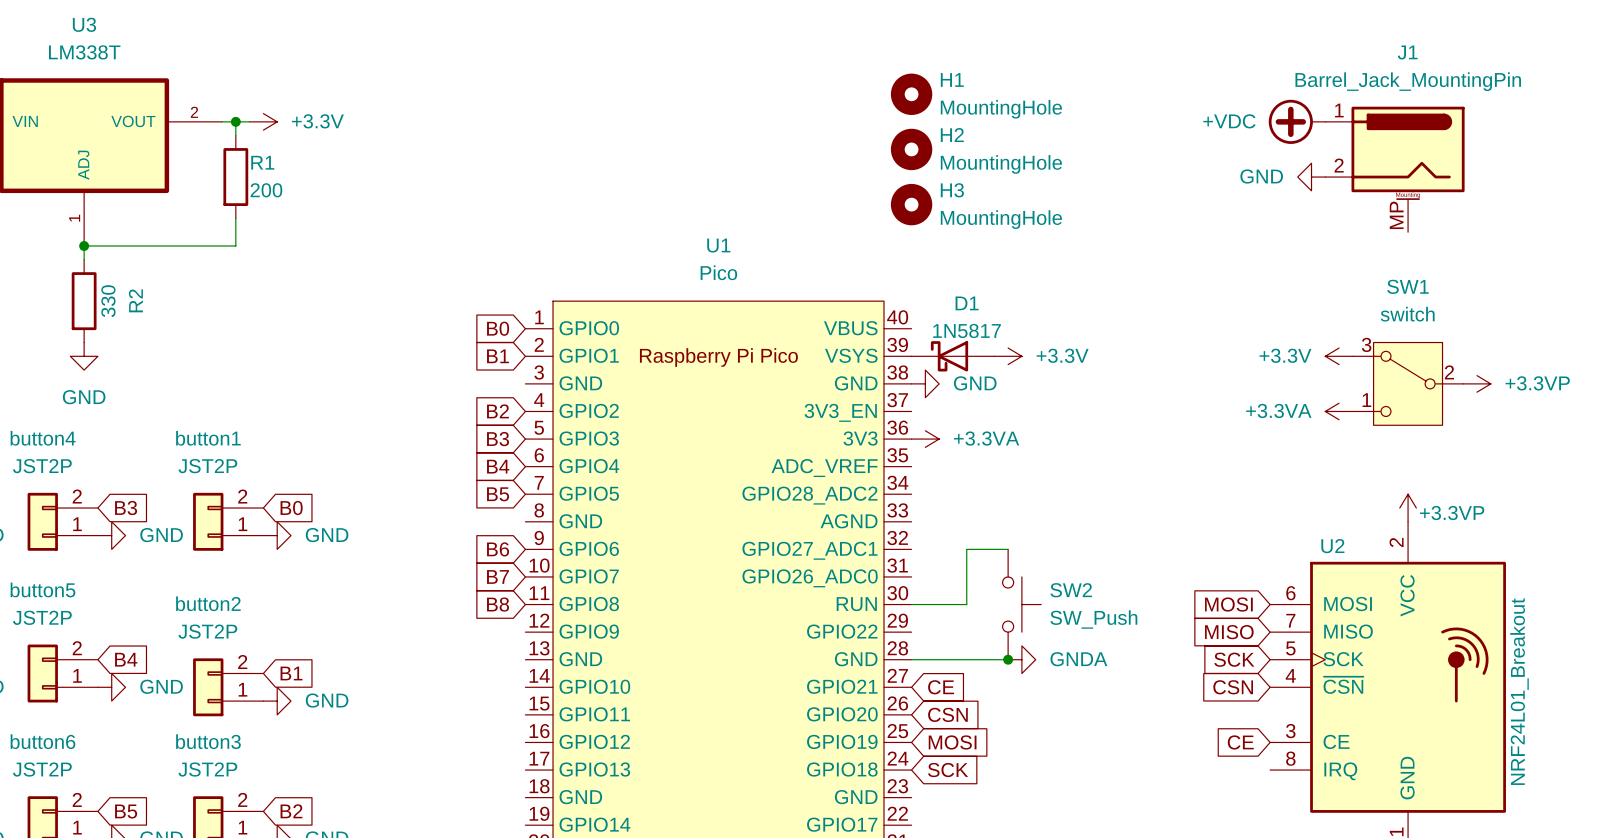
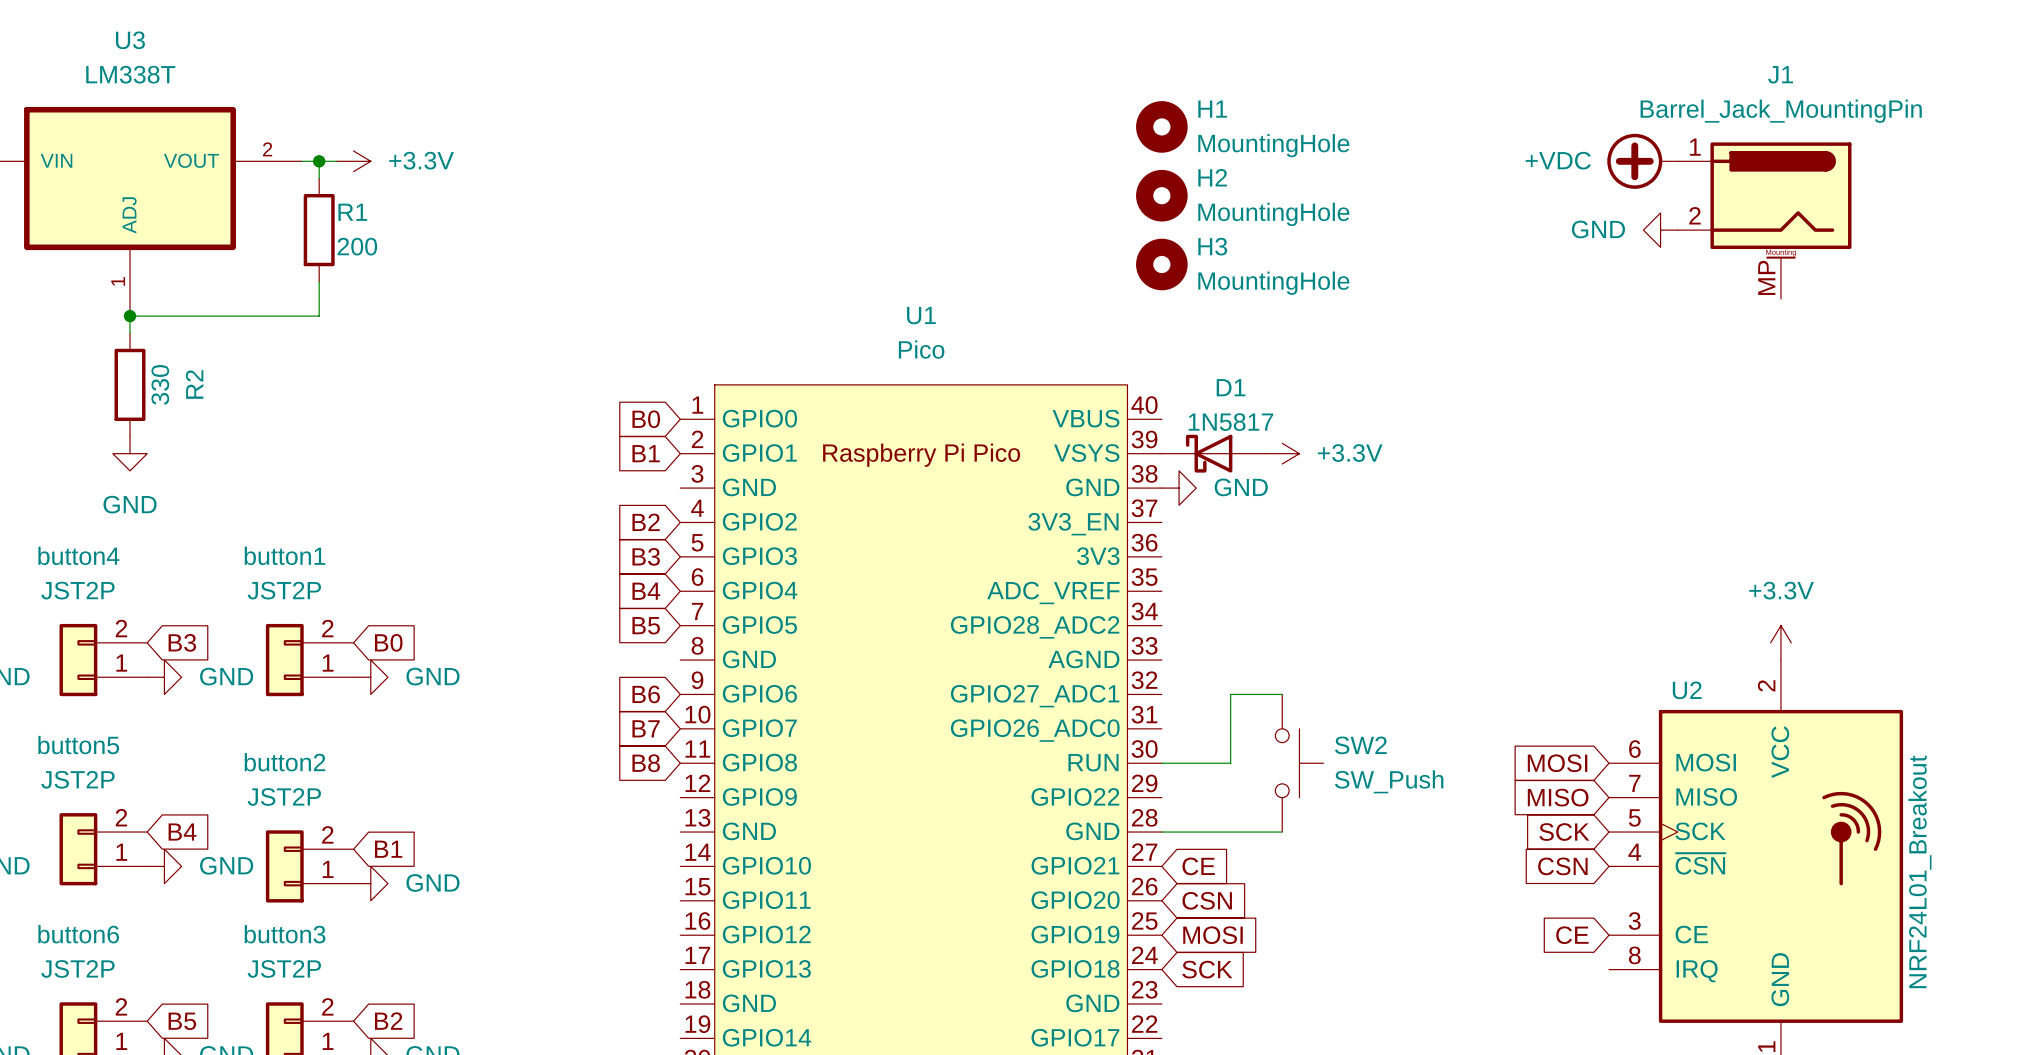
power symbol: +3.3V (1339, 356) -> none
SW1: switch (1408, 383) -> none
power symbol: +3.3VP (1477, 383) -> none
power symbol: +3.3VA (1339, 411) -> none
power symbol: +3.3VA (925, 439) -> none
power symbol: +3.3VP (1408, 508) -> +3.3V (1780, 642)
junction: (1008, 659) -> none
power symbol: GNDA (1021, 659) -> none

